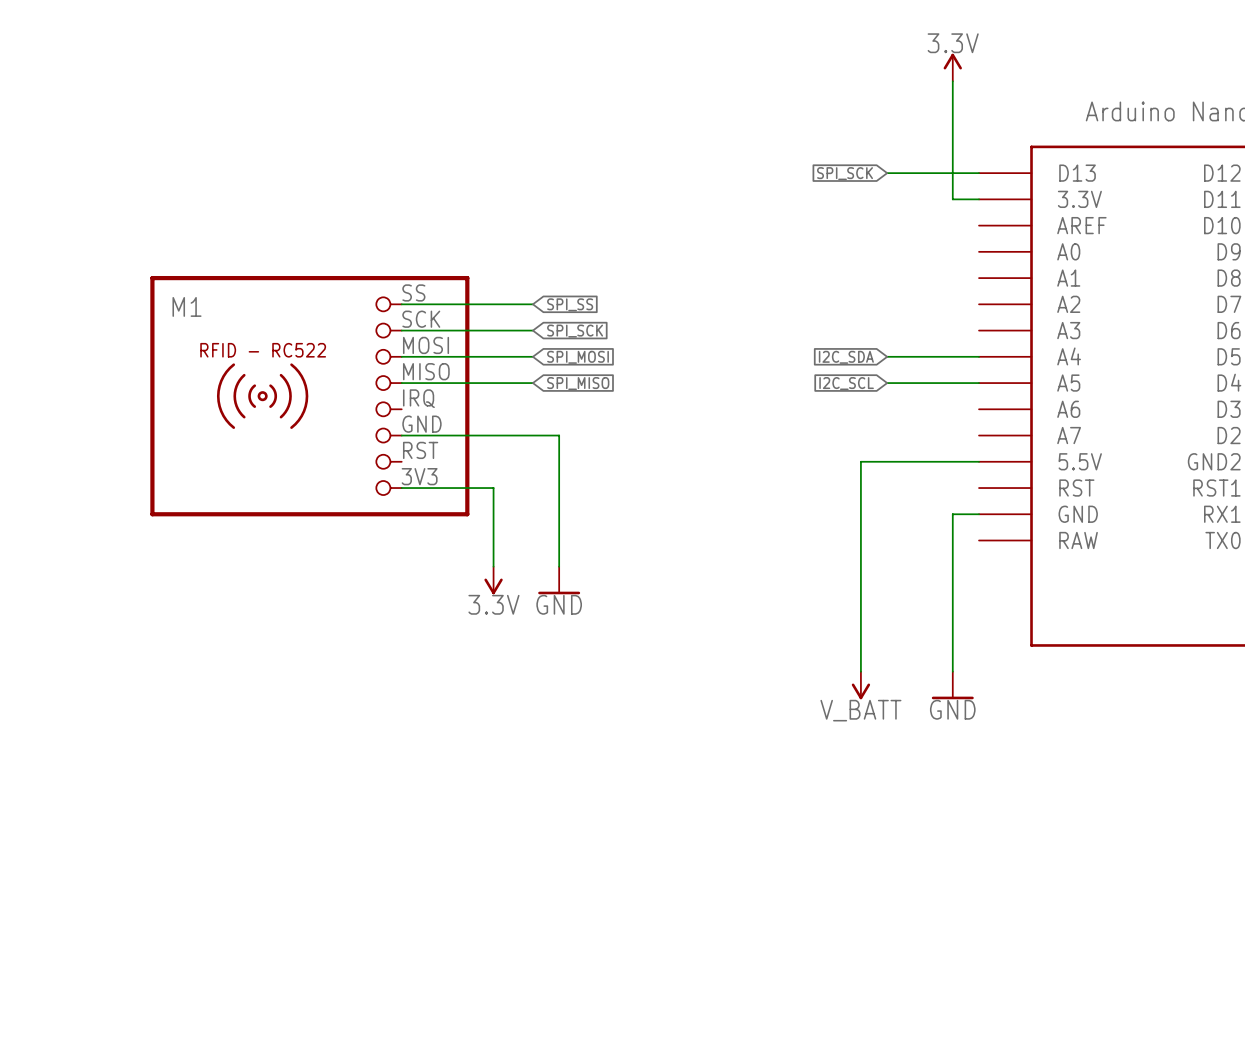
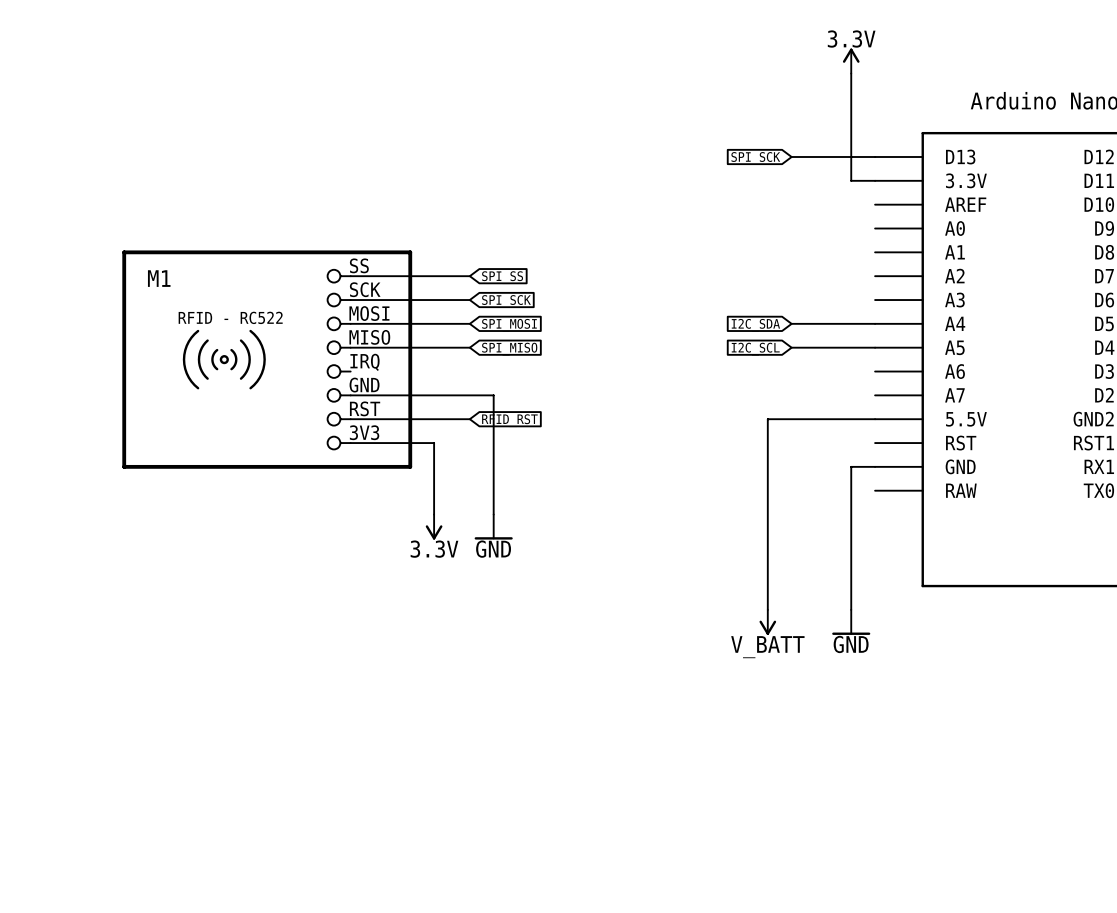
wire: none -> (350, 419) (469, 419)
global label: none -> RFID_RST (509, 420)

